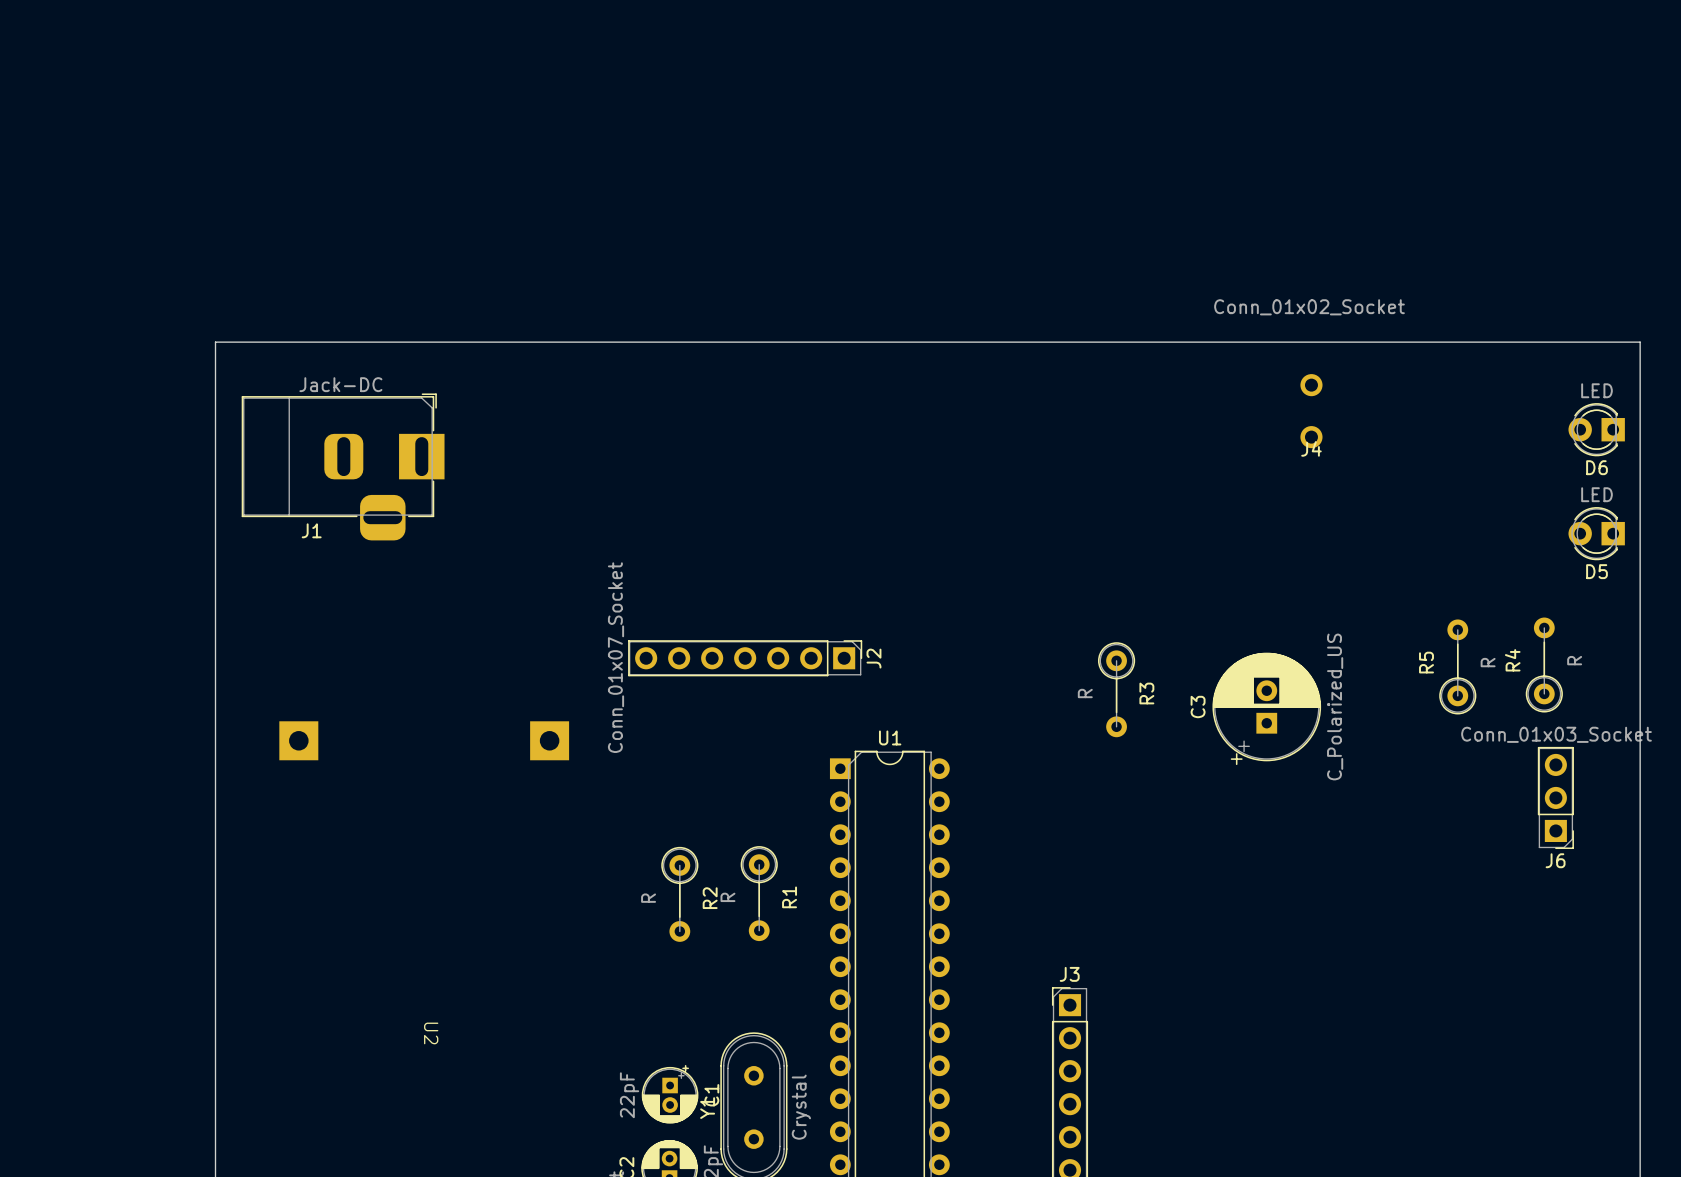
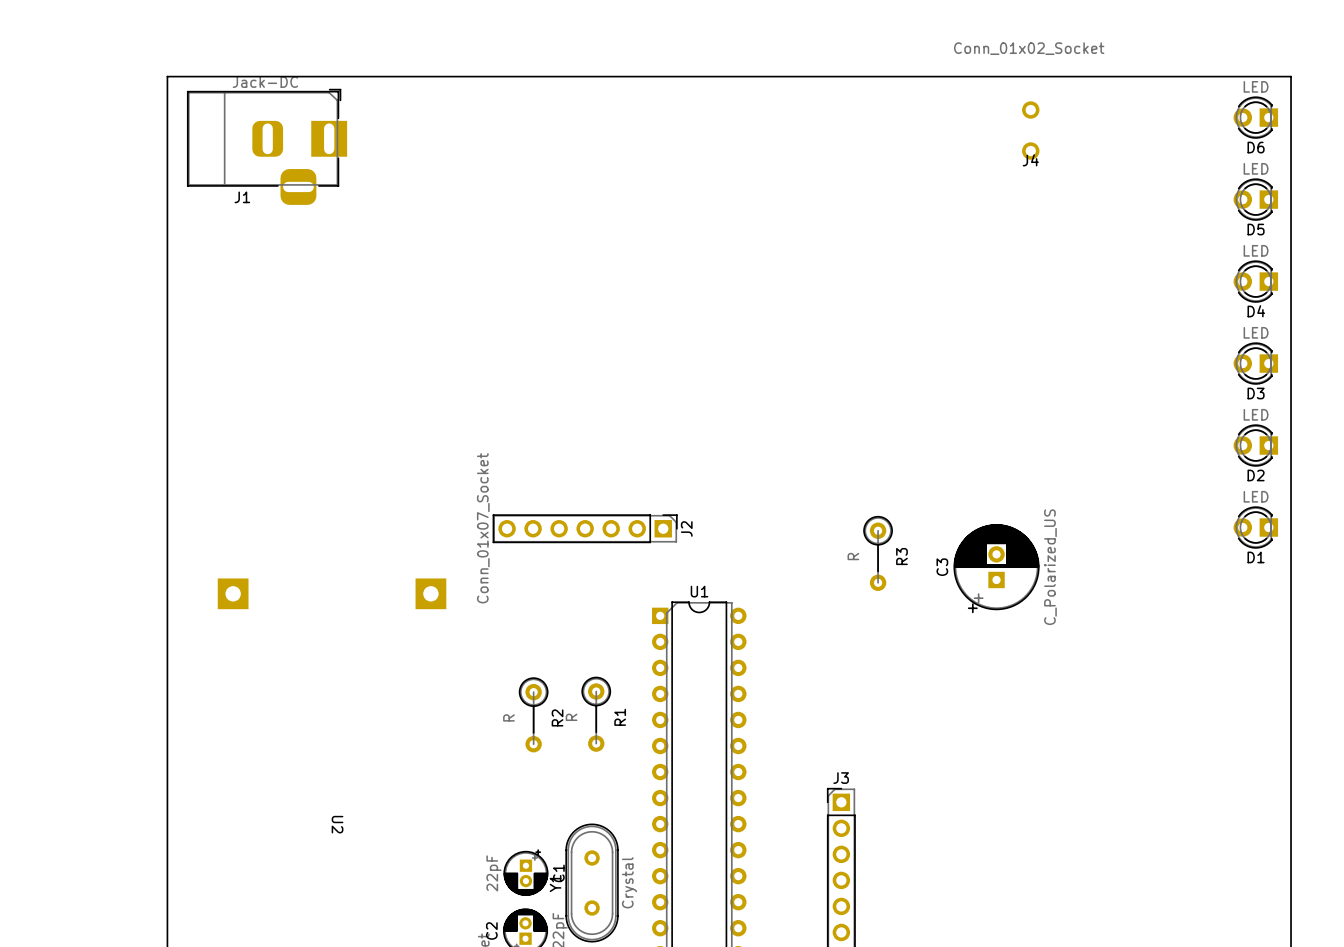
board edge: (215, 342) (1640, 342) -> (167, 279) (167, 76) (1291, 76) (1291, 279)
D4: none -> LED (1255, 281)
J4 position: (1311, 411) -> (1030, 130)
D6 position: (1596, 429) -> (1255, 117)
D3: none -> LED (1255, 363)
J1 position: (343, 466) -> (267, 146)
D5 position: (1596, 533) -> (1255, 199)
D2: none -> LED (1255, 445)
D1: none -> LED (1255, 527)
R4: R (1544, 665) -> none
R5: R (1457, 666) -> none
J6: Conn_01x03_Socket (1555, 797) -> none

